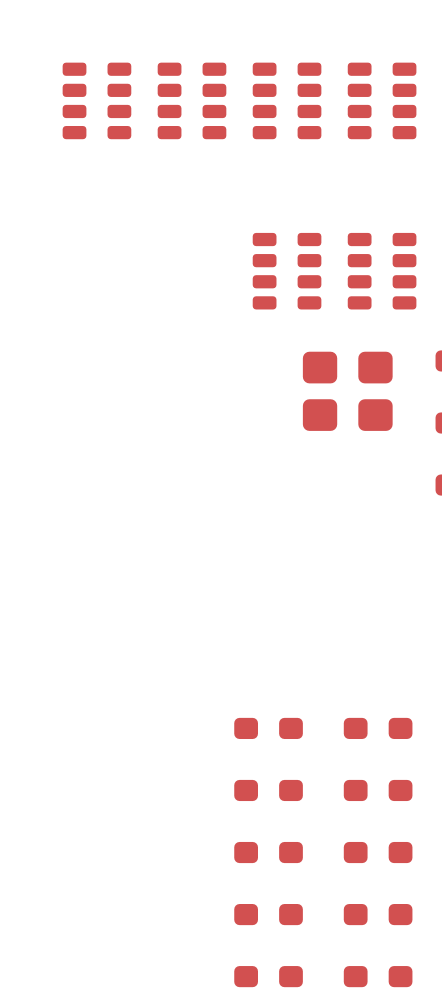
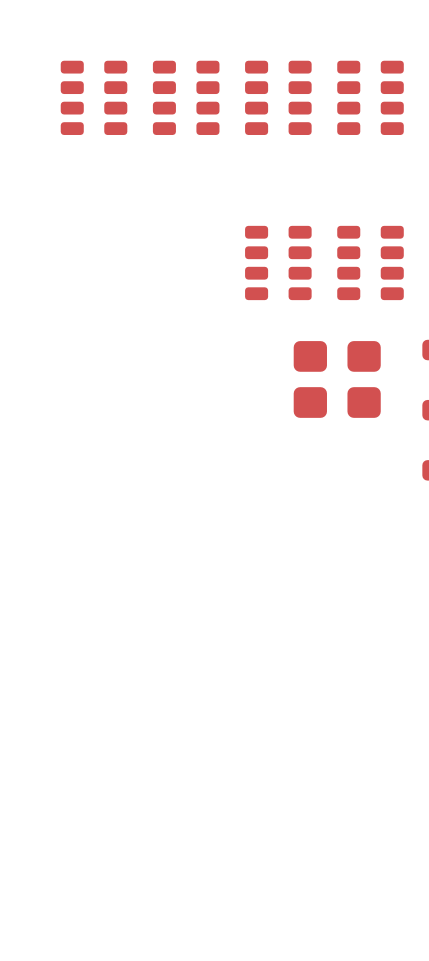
part: (268, 728) -> none
part: (378, 728) -> none
part: (268, 790) -> none
part: (378, 790) -> none
part: (268, 852) -> none
part: (378, 852) -> none
part: (268, 914) -> none
part: (378, 914) -> none
part: (268, 976) -> none
part: (378, 976) -> none

